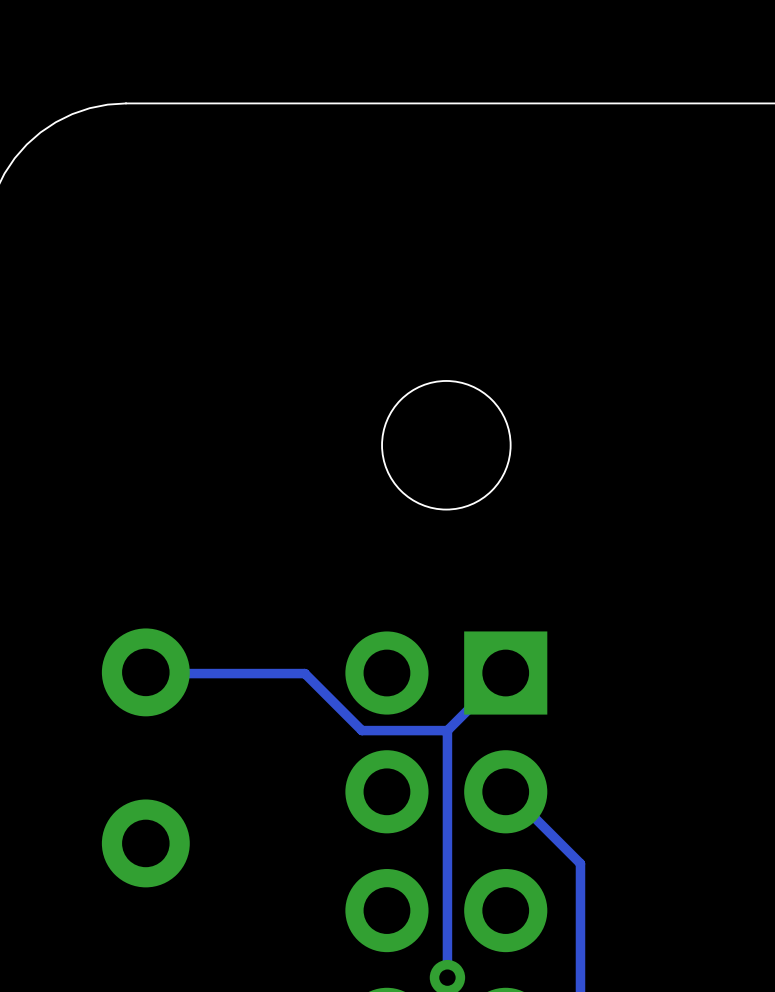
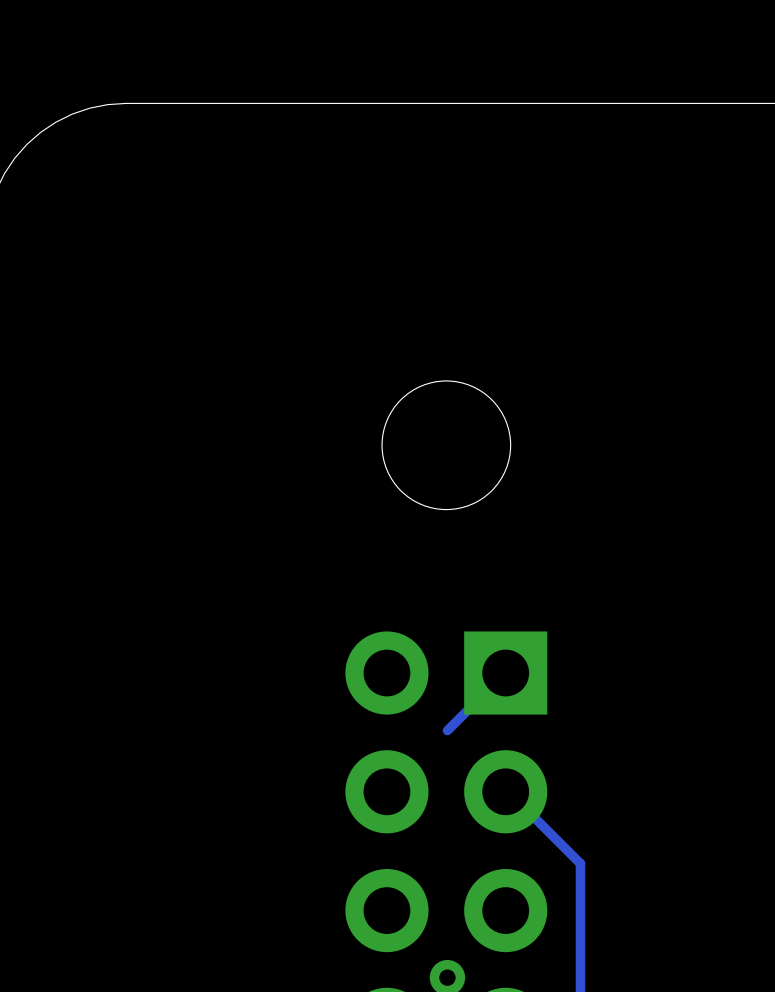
track: (145, 672) (304, 673) (361, 730) (447, 730) (447, 977) -> none
part: (145, 672) -> none
part: (145, 843) -> none

